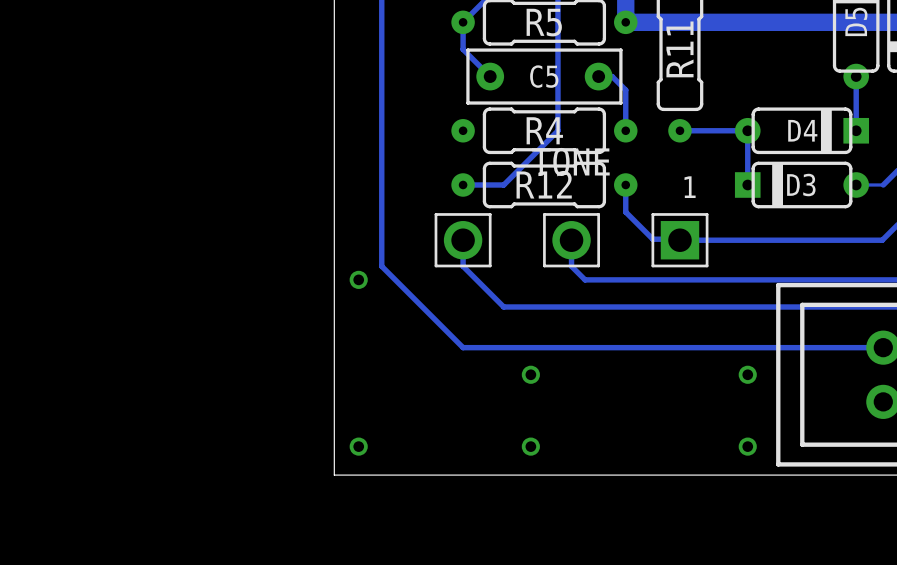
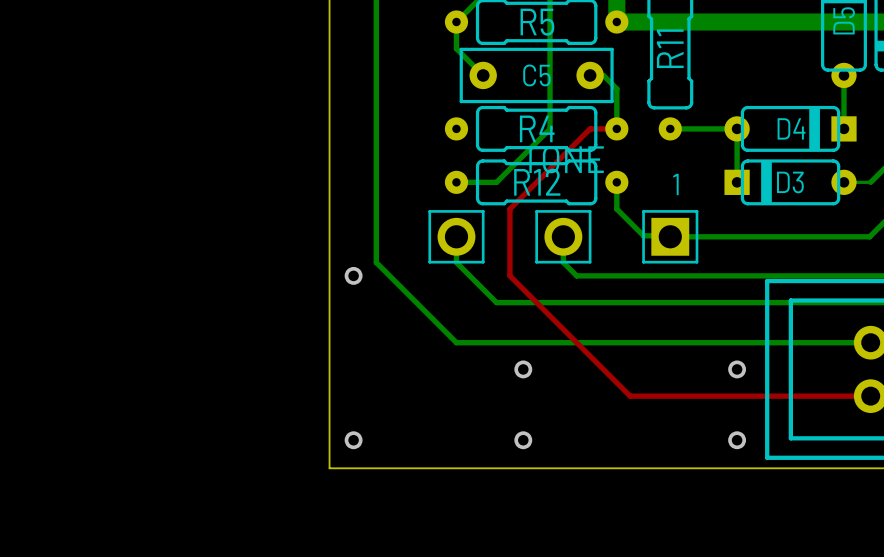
top track: none -> (616, 128) (590, 128) (509, 209) (509, 275) (630, 396) (870, 396)

